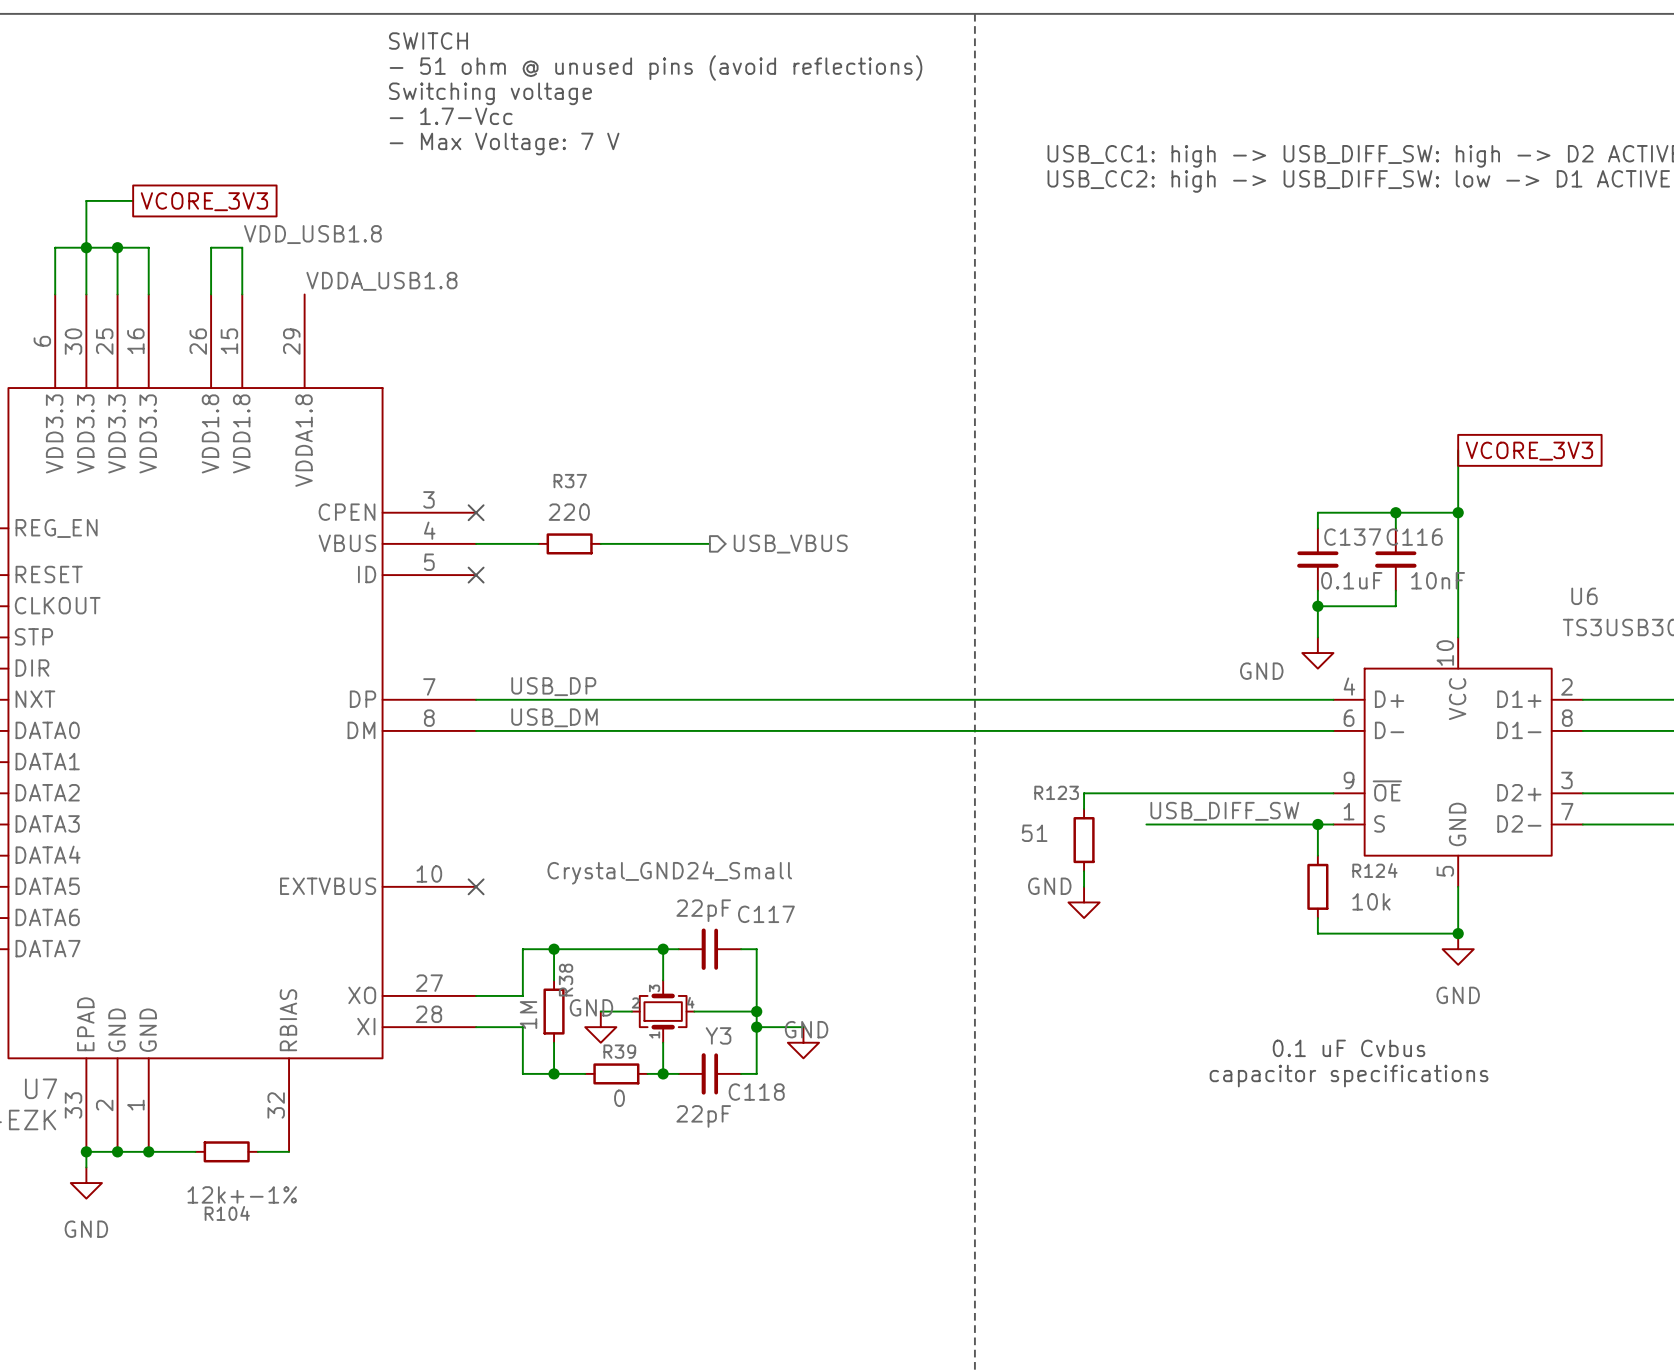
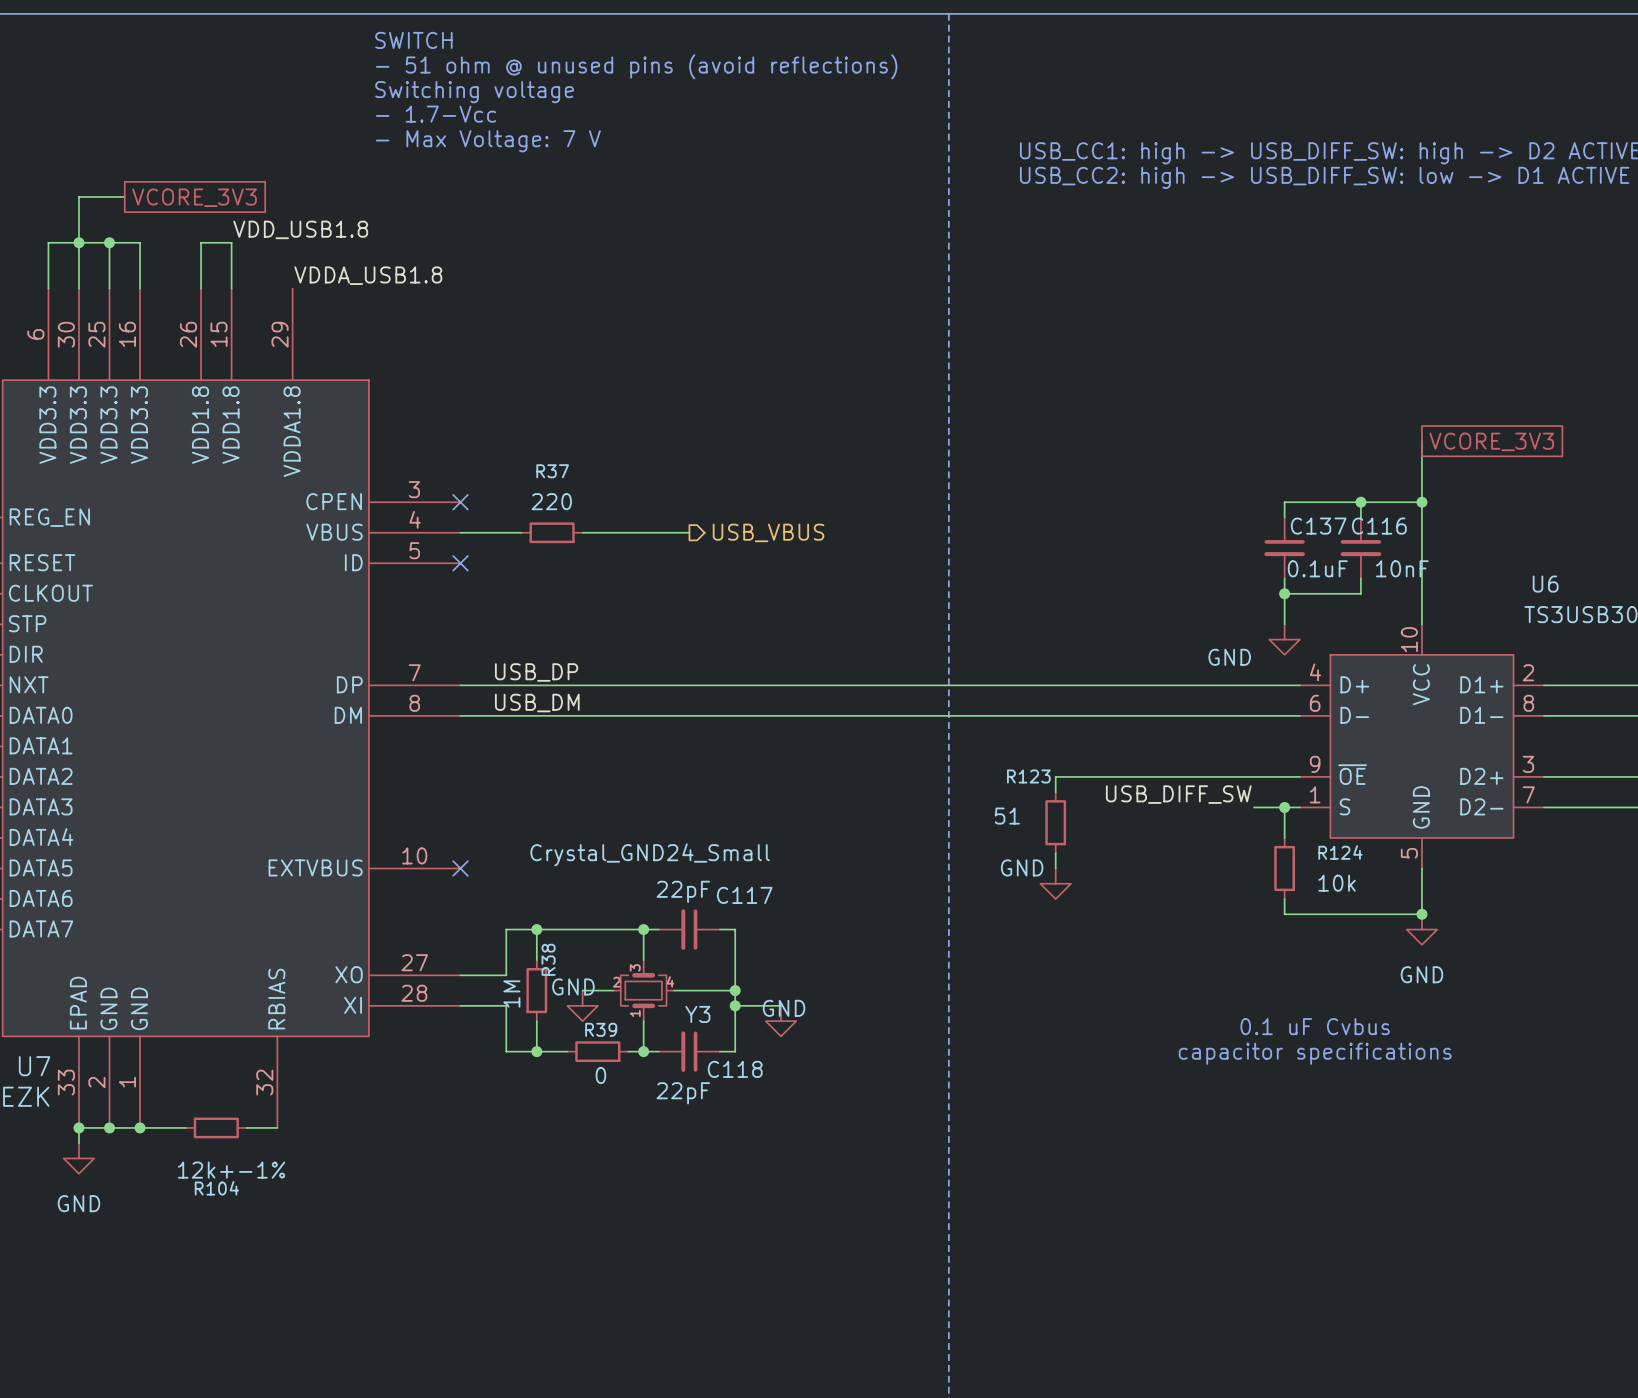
label position: USB_DIFF_SW (1224, 811) -> USB_DIFF_SW (1178, 794)
wire: (1146, 824) (1286, 824) -> none

